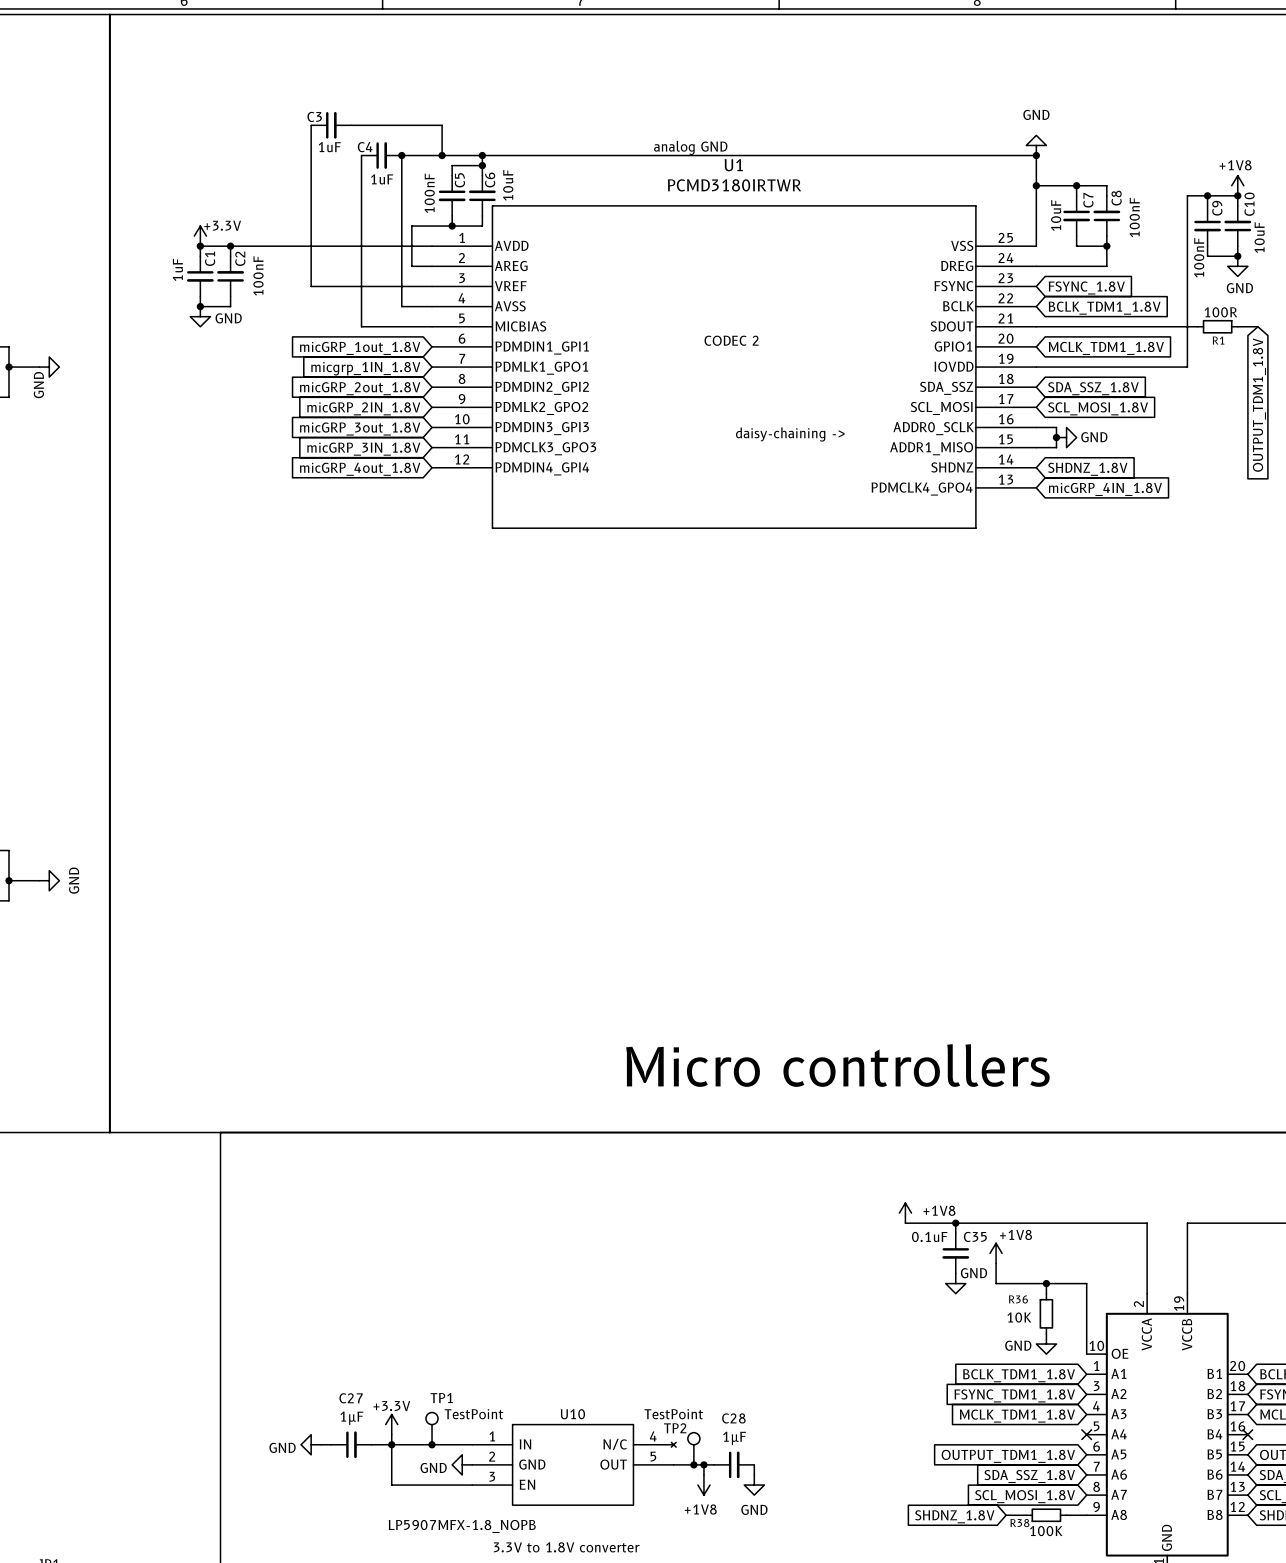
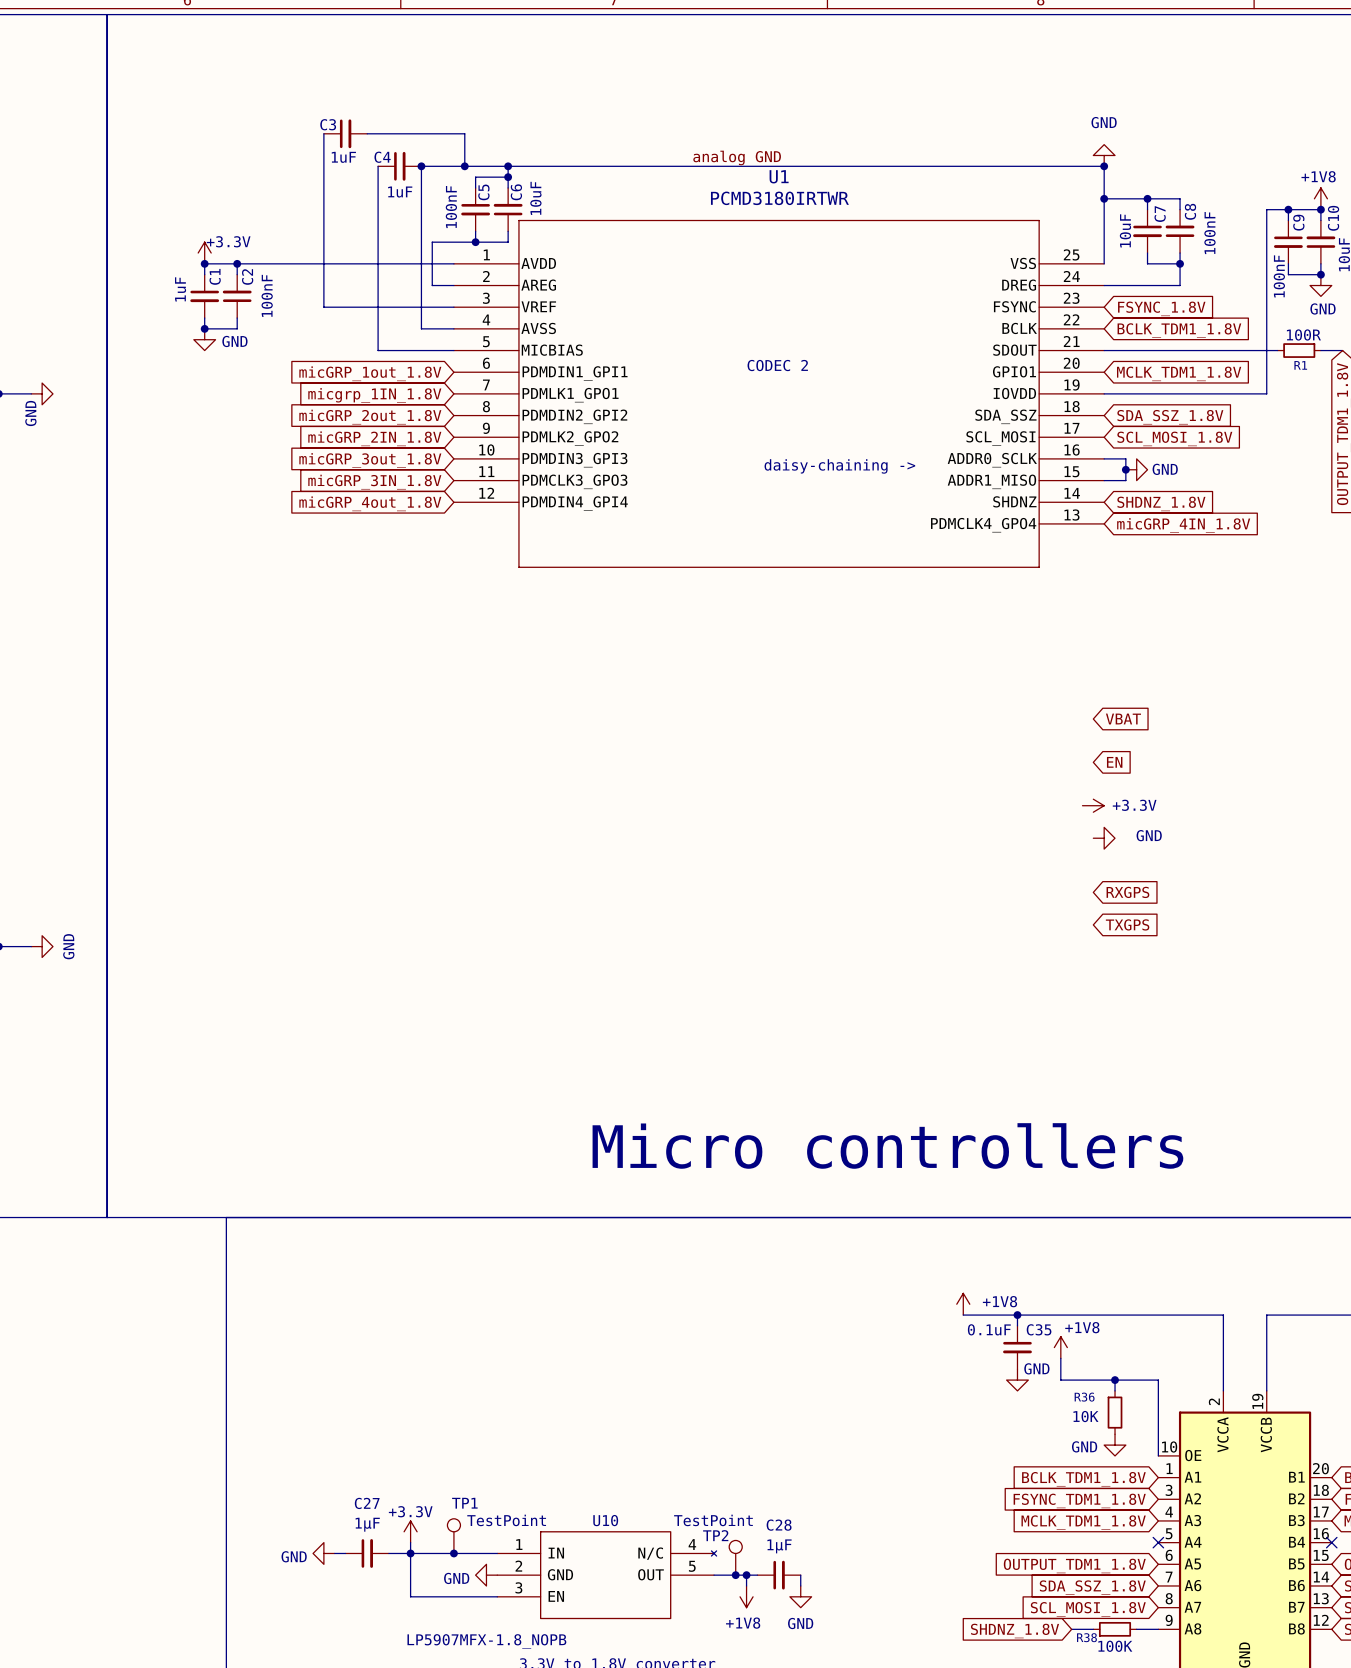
global label: none -> VBAT (1123, 719)
global label: none -> EN (1114, 762)
power symbol: none -> +3.3V (1093, 805)
power symbol: none -> GND (1104, 838)
global label: none -> RXGPS (1127, 892)
global label: none -> TXGPS (1127, 924)

